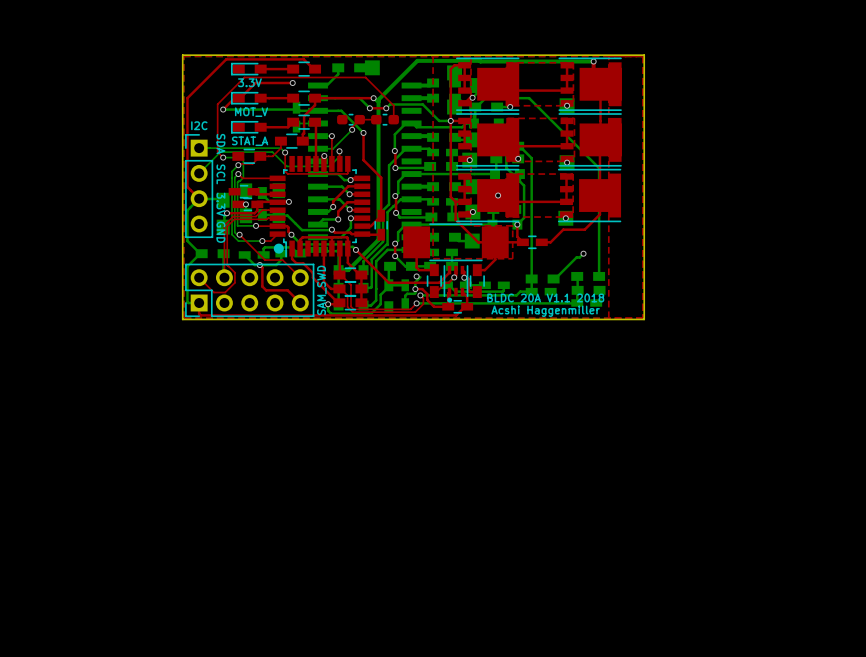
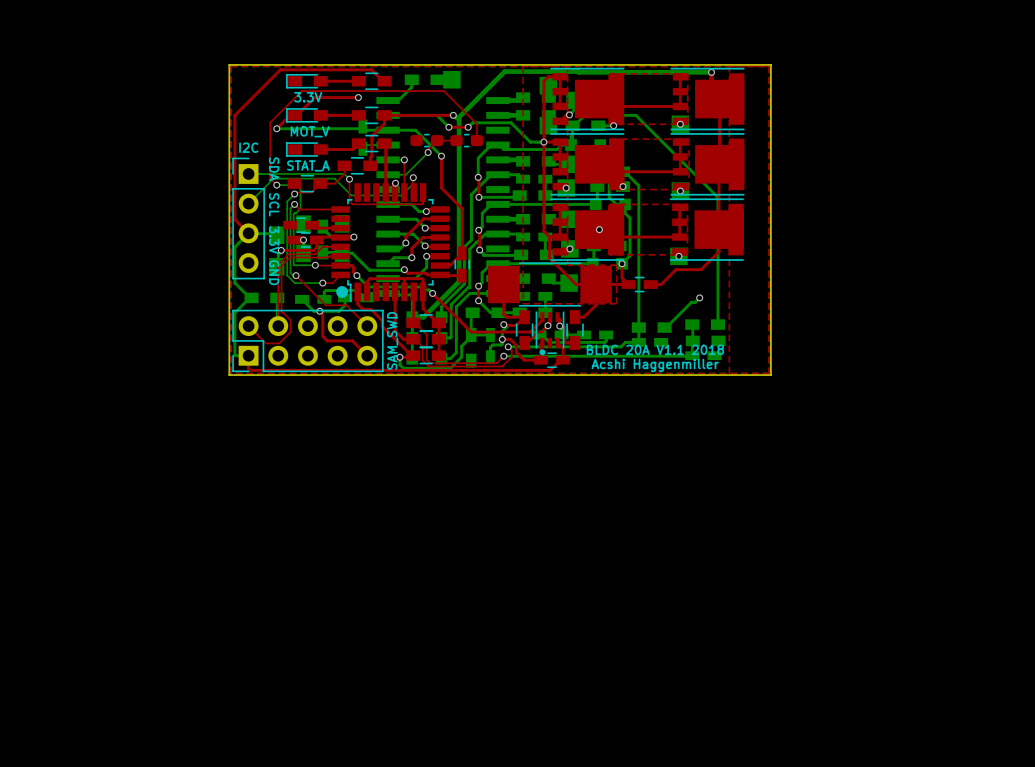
top track: none -> (524, 317) (516, 325) (508, 325)

